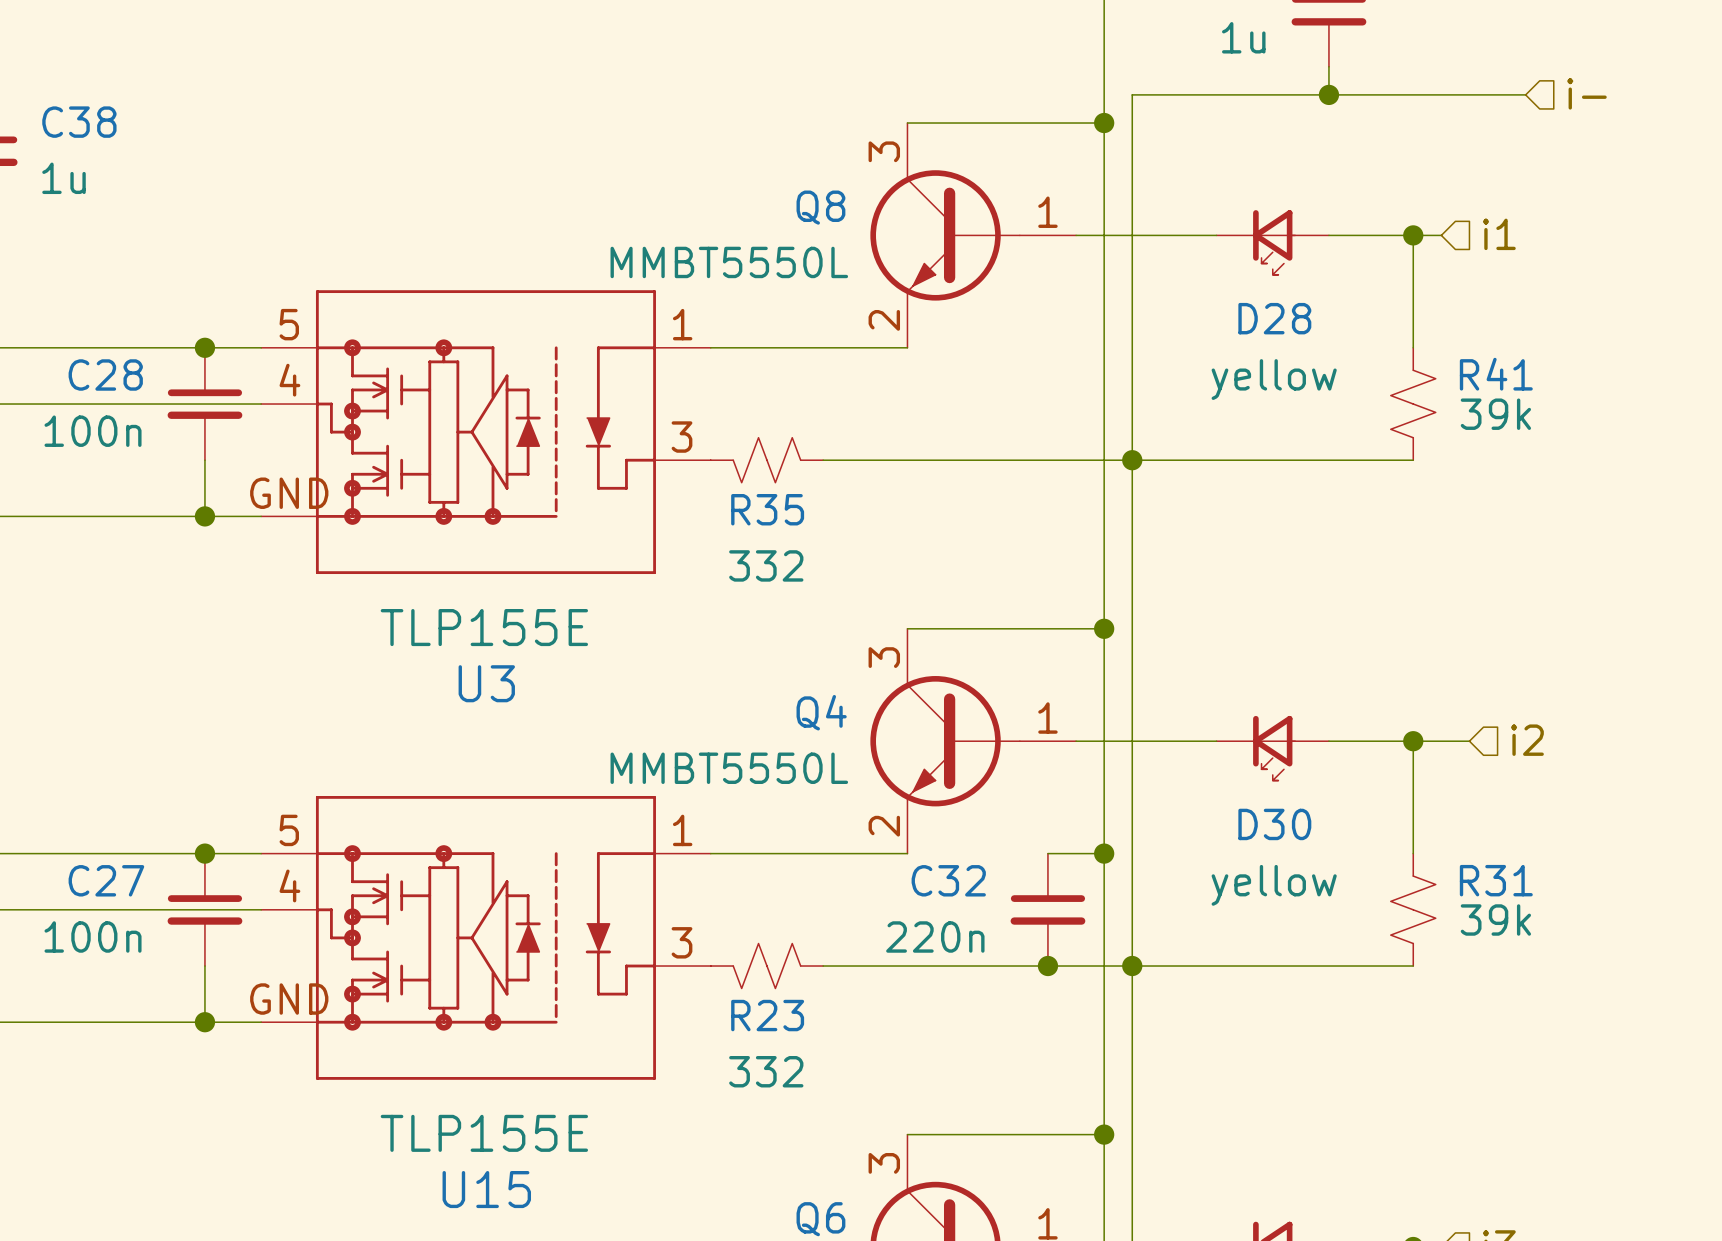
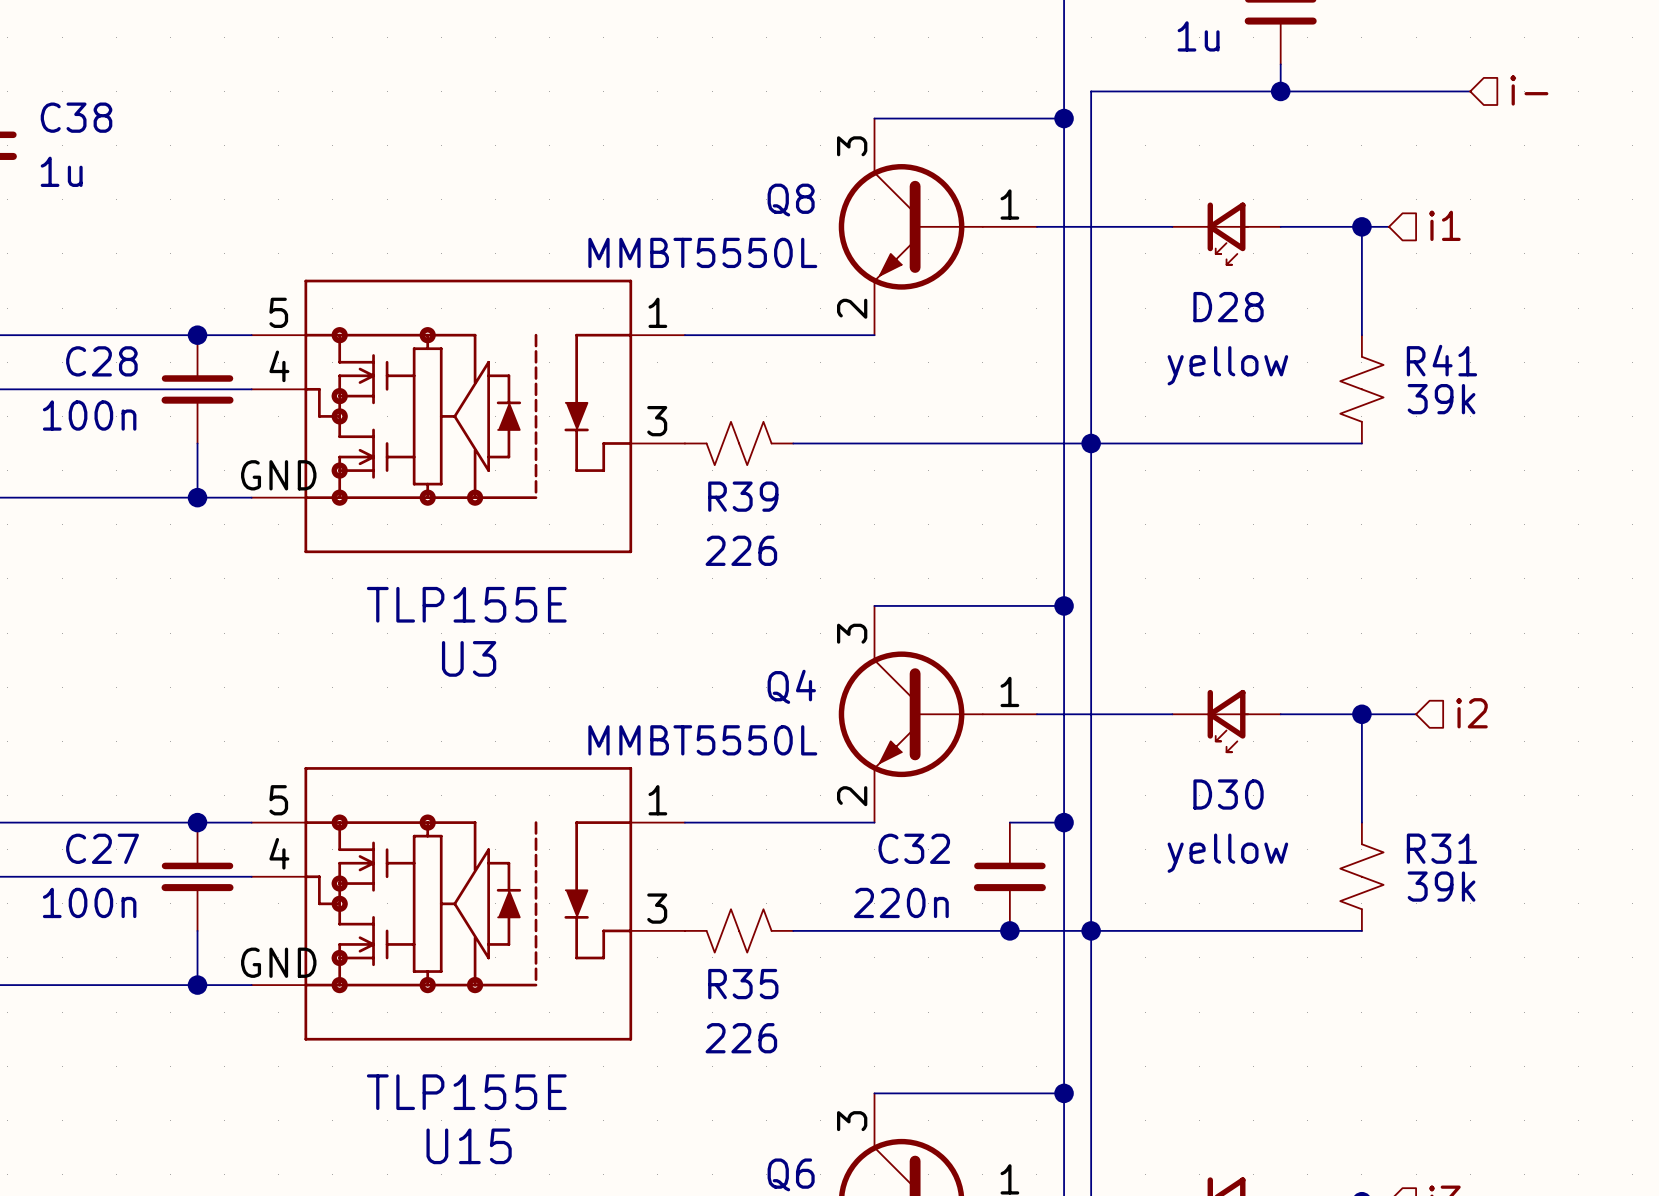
R35 name: R35 (767, 509) -> R39 (743, 496)
R35 value: 332 (766, 565) -> 226 (741, 550)
R23 name: R23 (767, 1015) -> R35 (743, 984)
R23 value: 332 (766, 1071) -> 226 (741, 1038)

